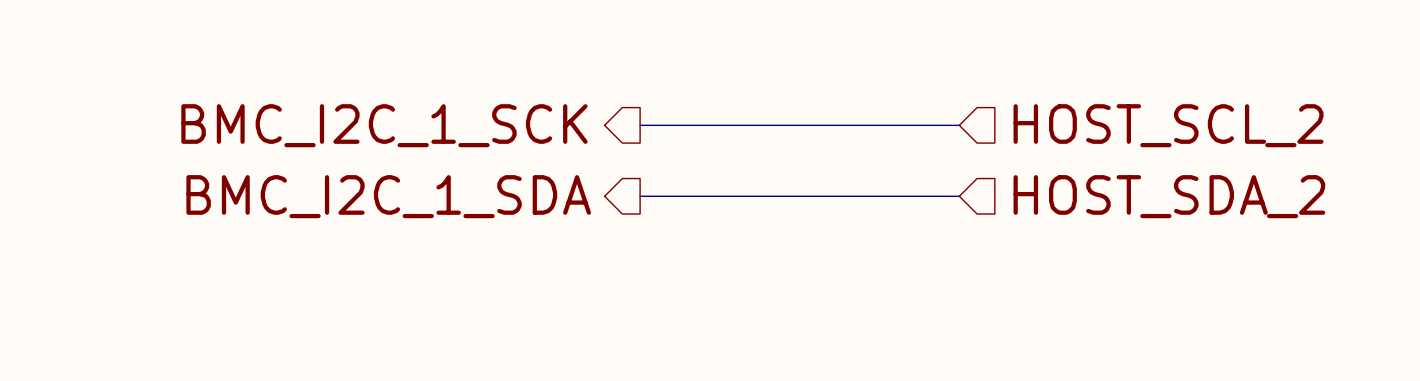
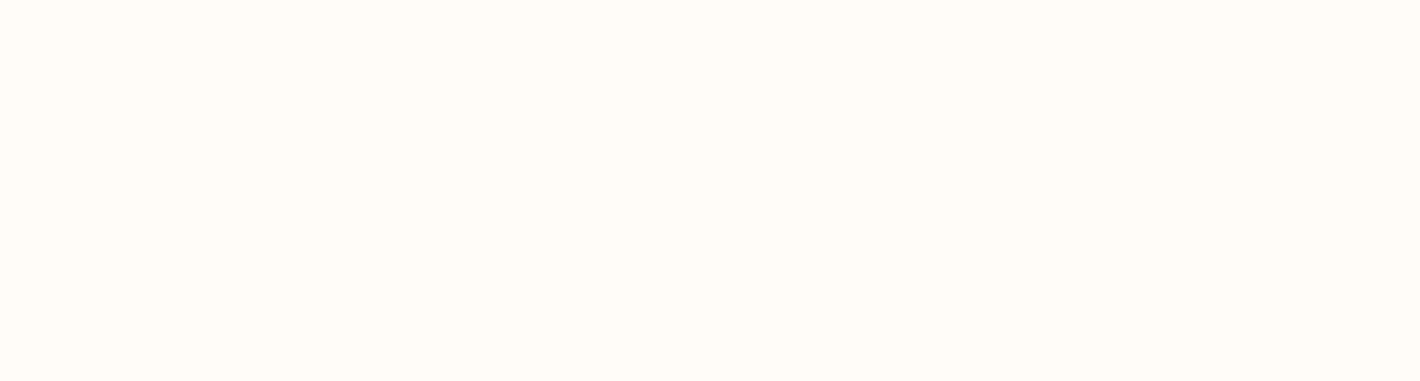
hierarchical label: BMC_I2C_1_SCK (384, 125) -> none
wire: (640, 125) (959, 125) -> none
hierarchical label: HOST_SCL_2 (1168, 125) -> none
hierarchical label: BMC_I2C_1_SDA (388, 196) -> none
wire: (640, 196) (959, 196) -> none
hierarchical label: HOST_SDA_2 (1169, 196) -> none

